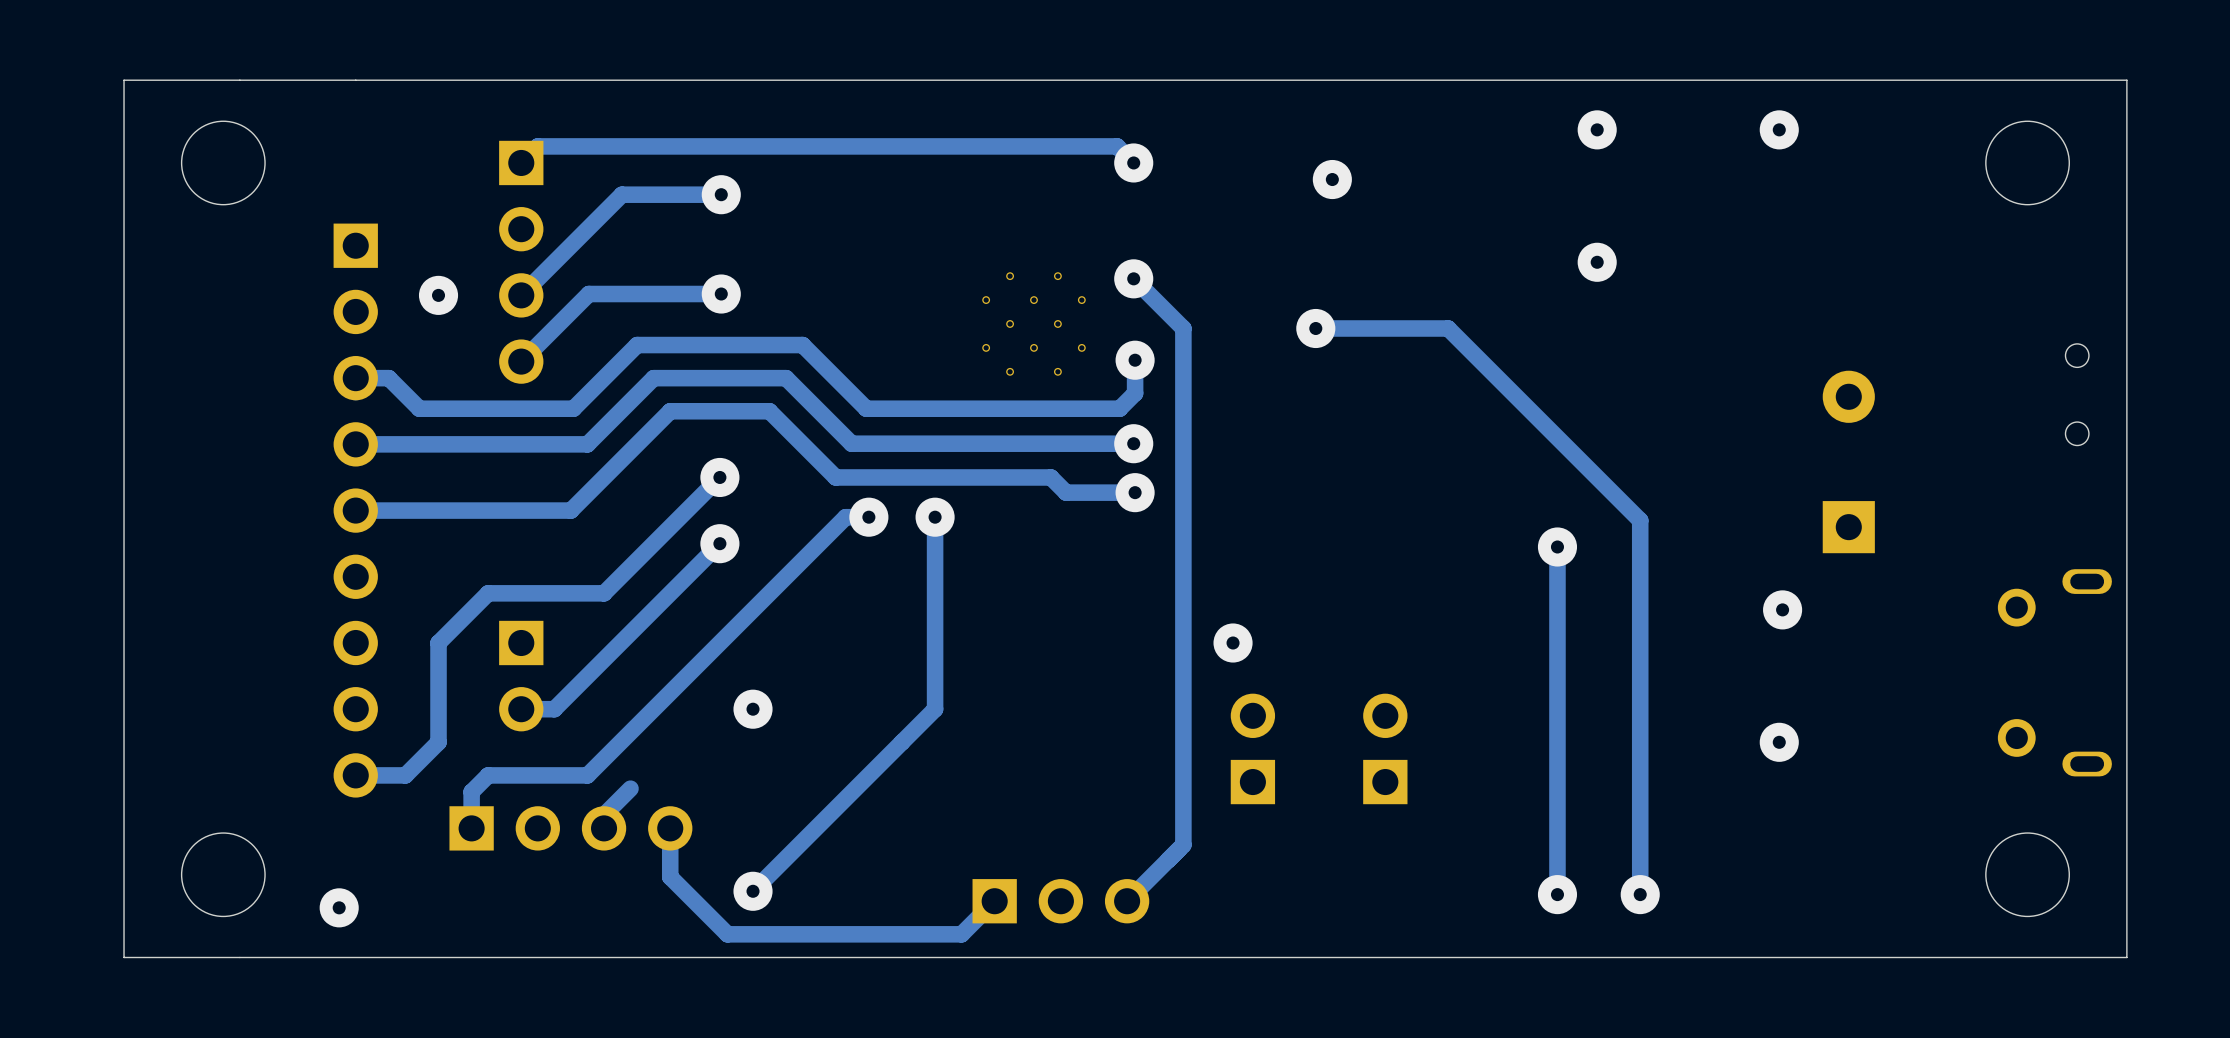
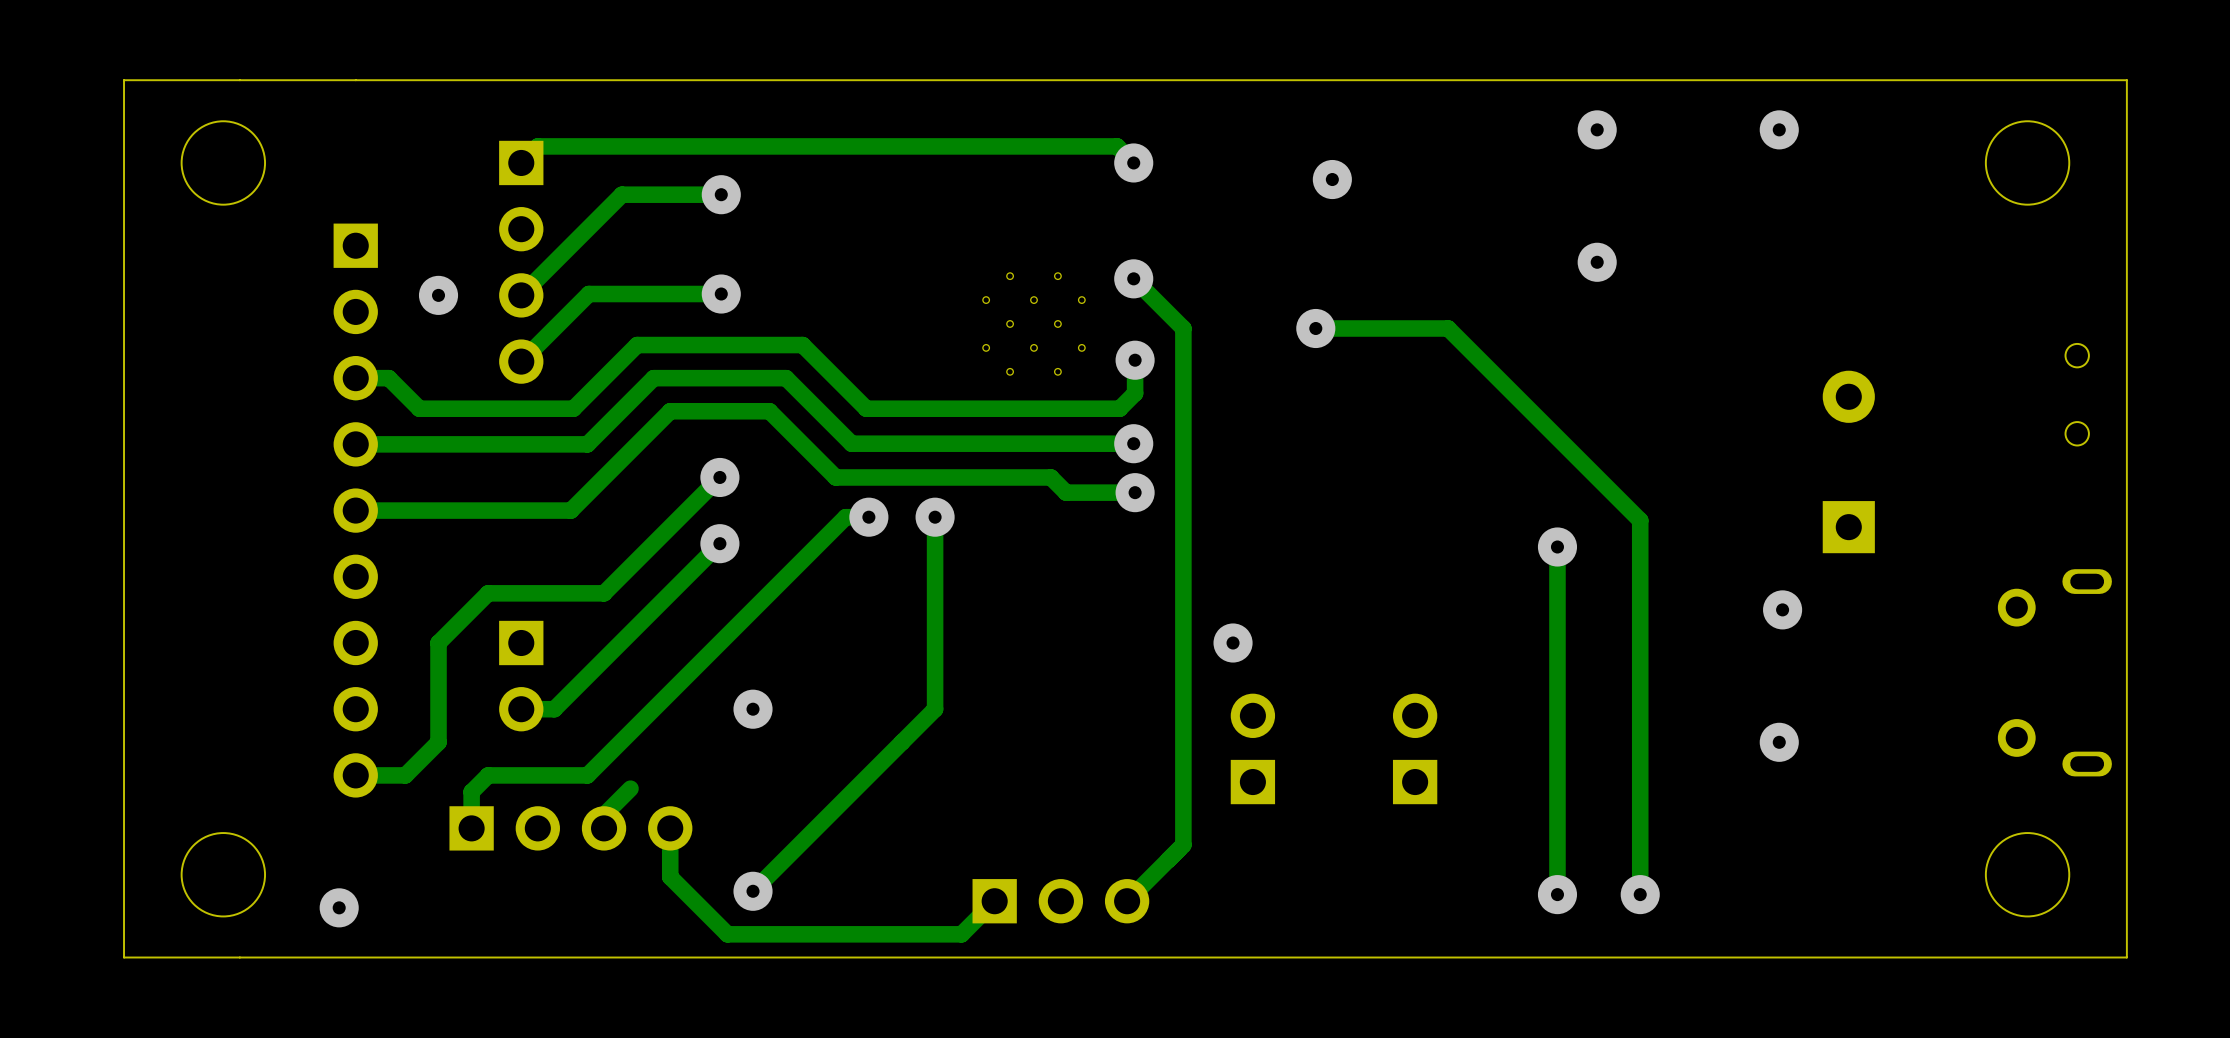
part position: (1385, 748) -> (1415, 748)

